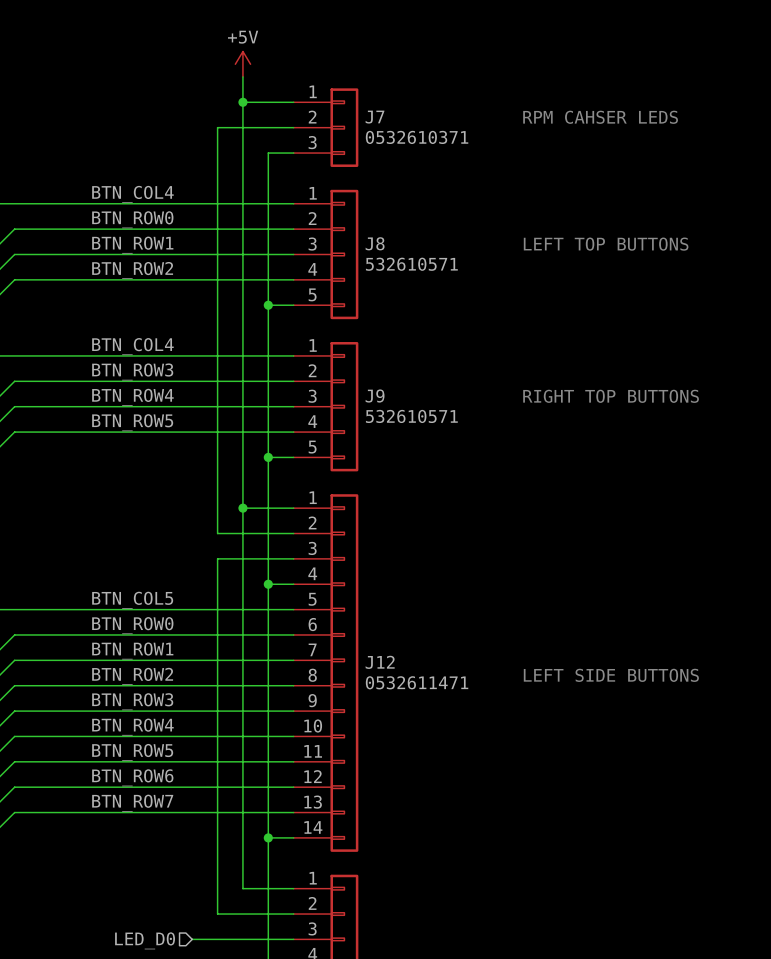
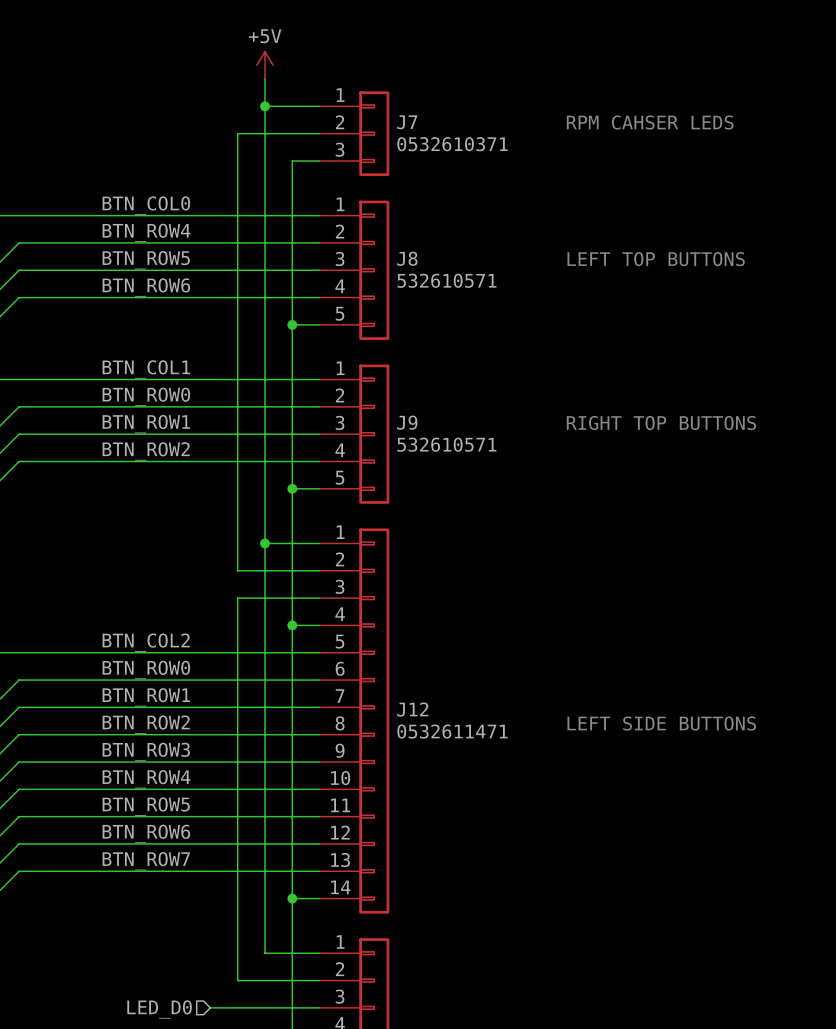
label: BTN_COL4 (132, 194) -> BTN_COL0 (146, 205)
label: BTN_ROW0 (132, 219) -> BTN_ROW4 (146, 232)
label: BTN_ROW1 (132, 245) -> BTN_ROW5 (146, 260)
label: BTN_ROW2 (132, 270) -> BTN_ROW6 (146, 287)
label: BTN_COL4 (132, 346) -> BTN_COL1 (146, 369)
label: BTN_ROW3 (132, 371) -> BTN_ROW0 (146, 396)
label: BTN_ROW4 (132, 397) -> BTN_ROW1 (146, 424)
label: BTN_ROW5 (132, 422) -> BTN_ROW2 (146, 451)
label: BTN_COL5 (132, 600) -> BTN_COL2 (146, 642)

